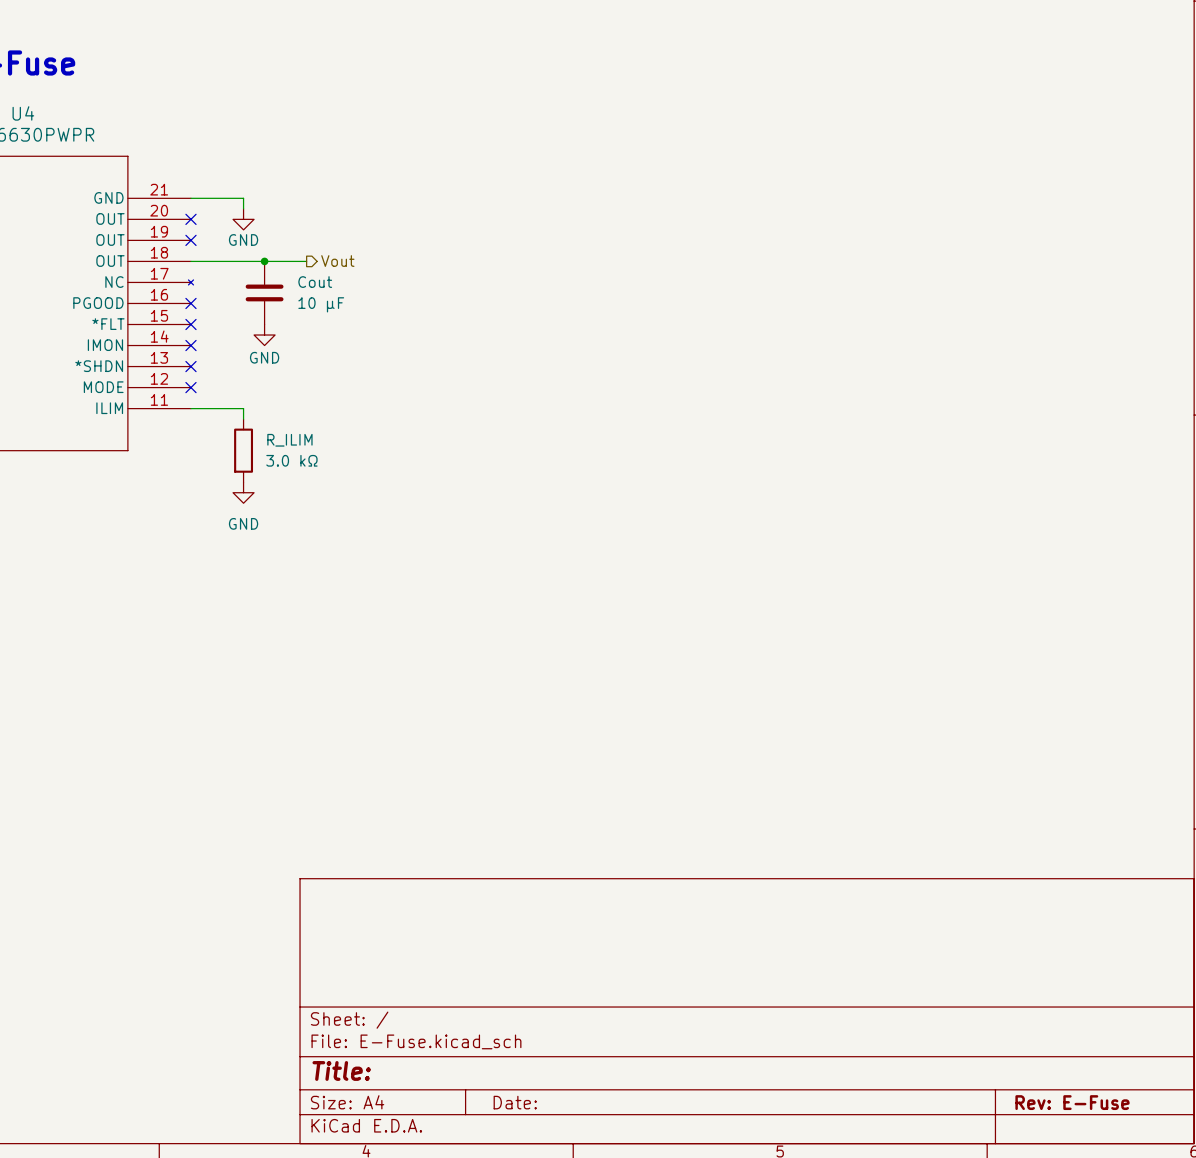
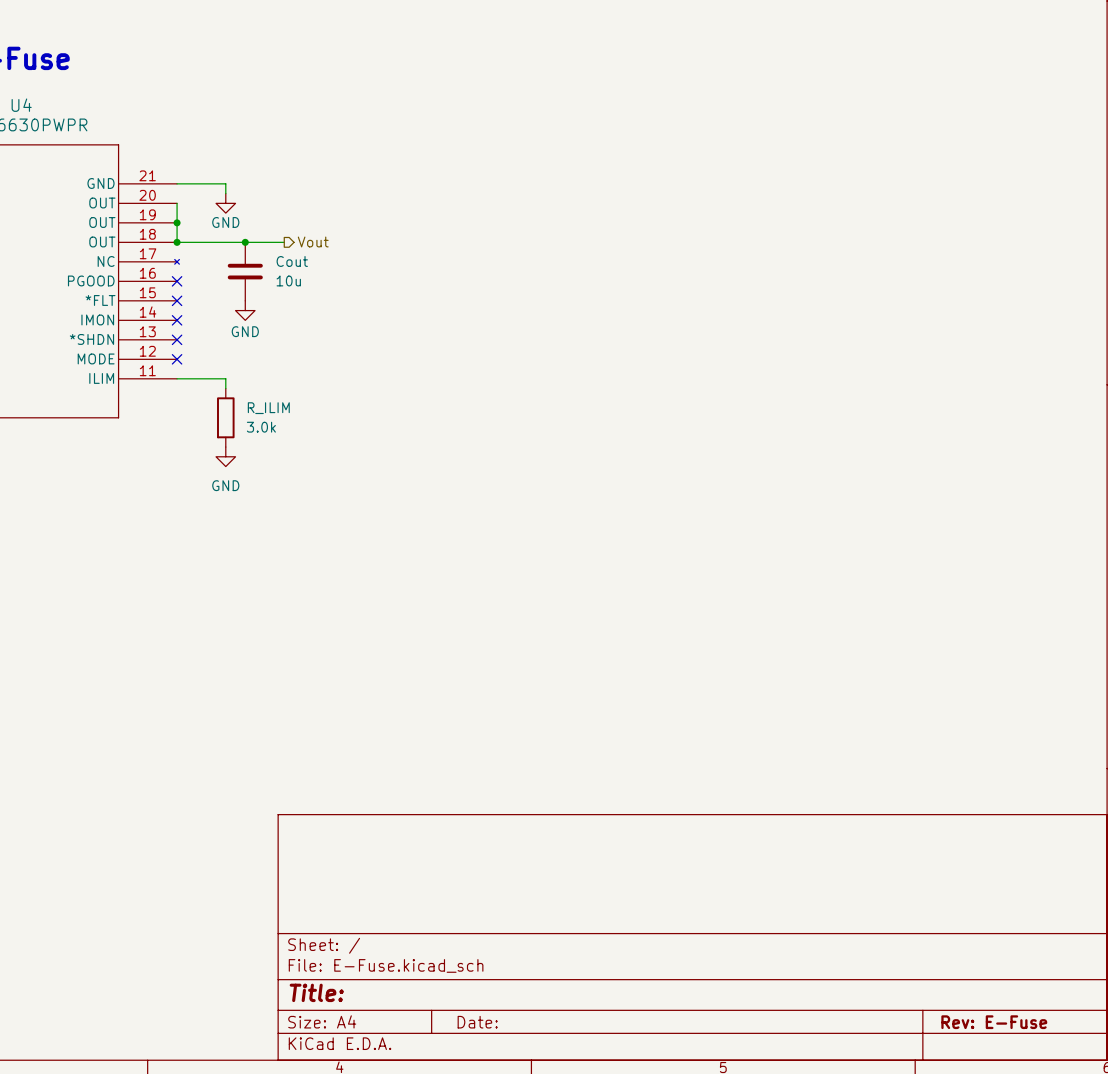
wire: none -> (177, 203) (177, 242)
no-connect mark: (190, 219) -> none
no-connect mark: (190, 240) -> none
junction: none -> (177, 222)
junction: none -> (177, 242)
Cout value: 10 µF (321, 304) -> 10u (288, 280)
R_ILIM value: 3.0 kΩ (291, 460) -> 3.0k (261, 427)

